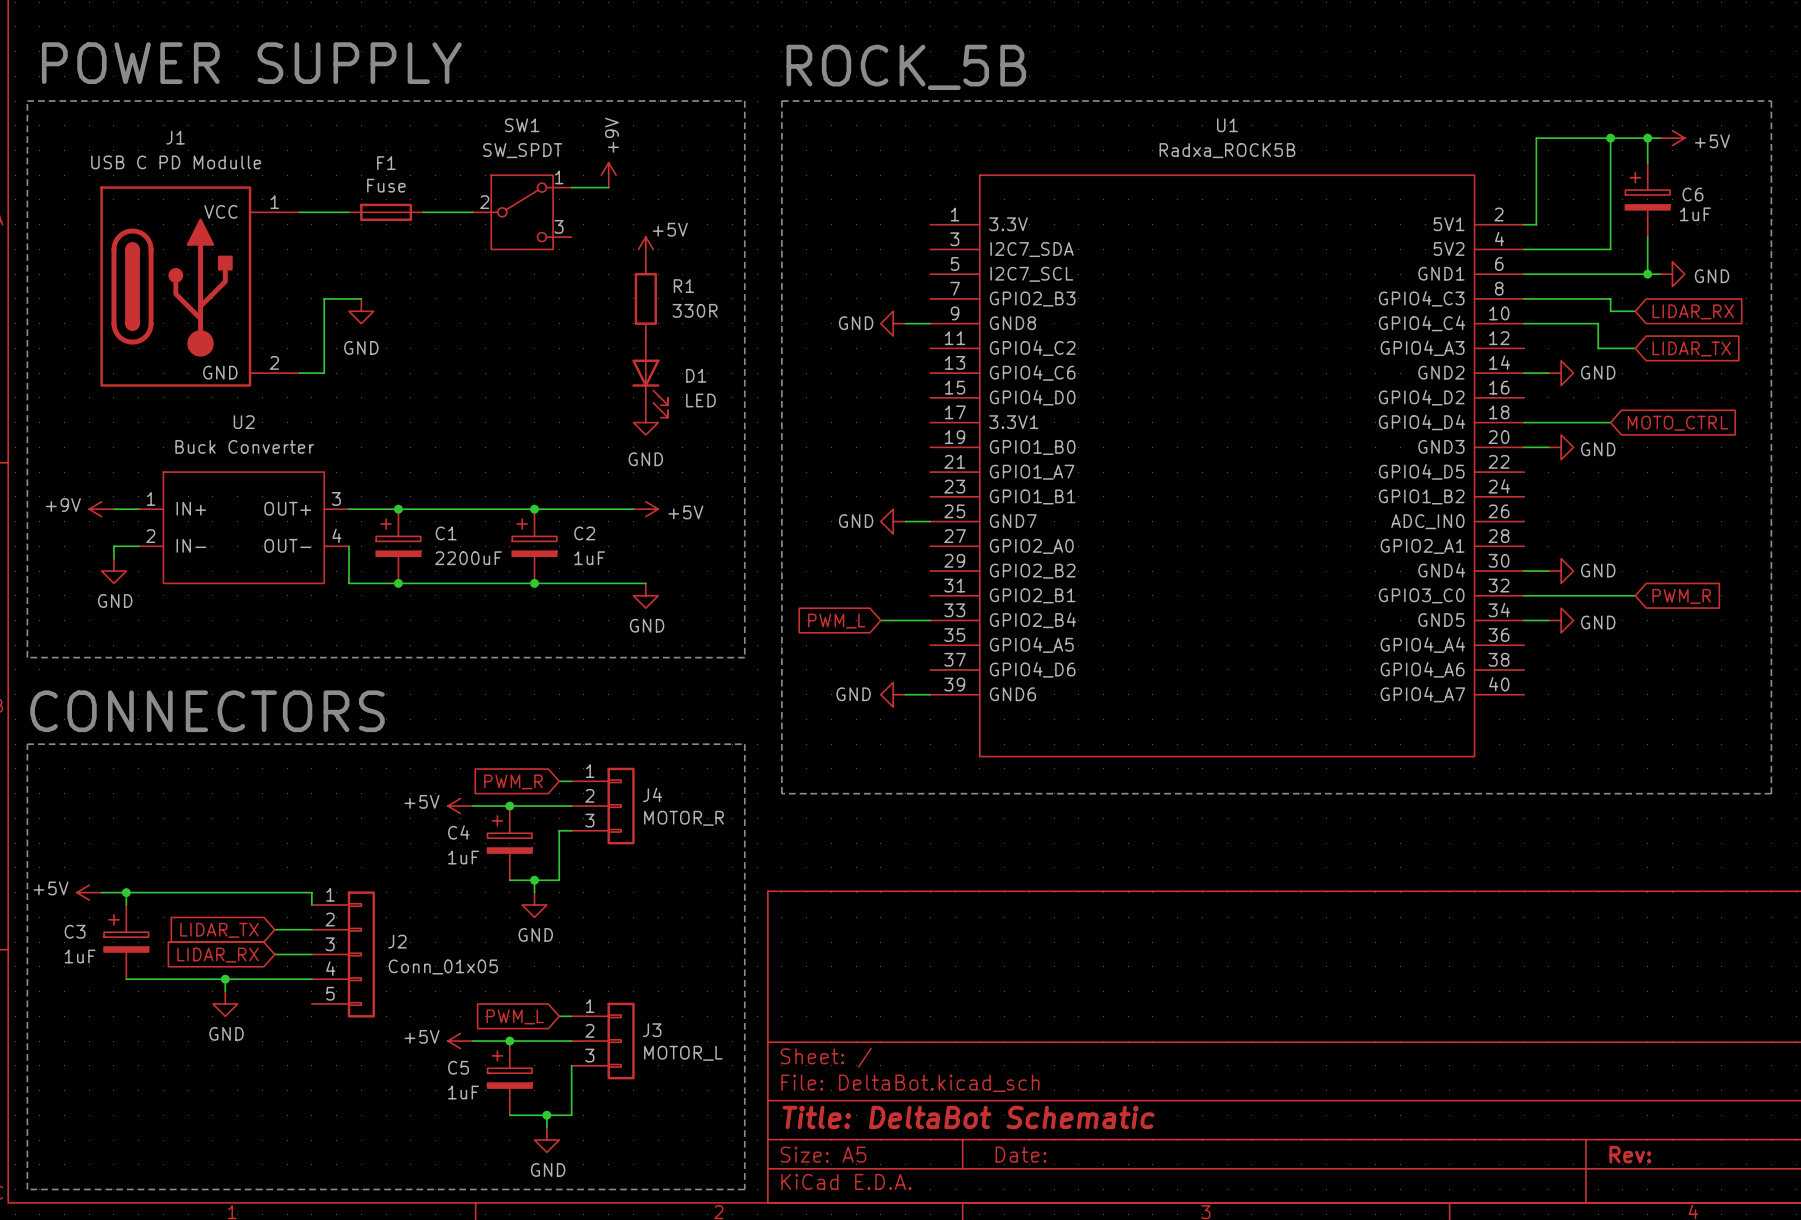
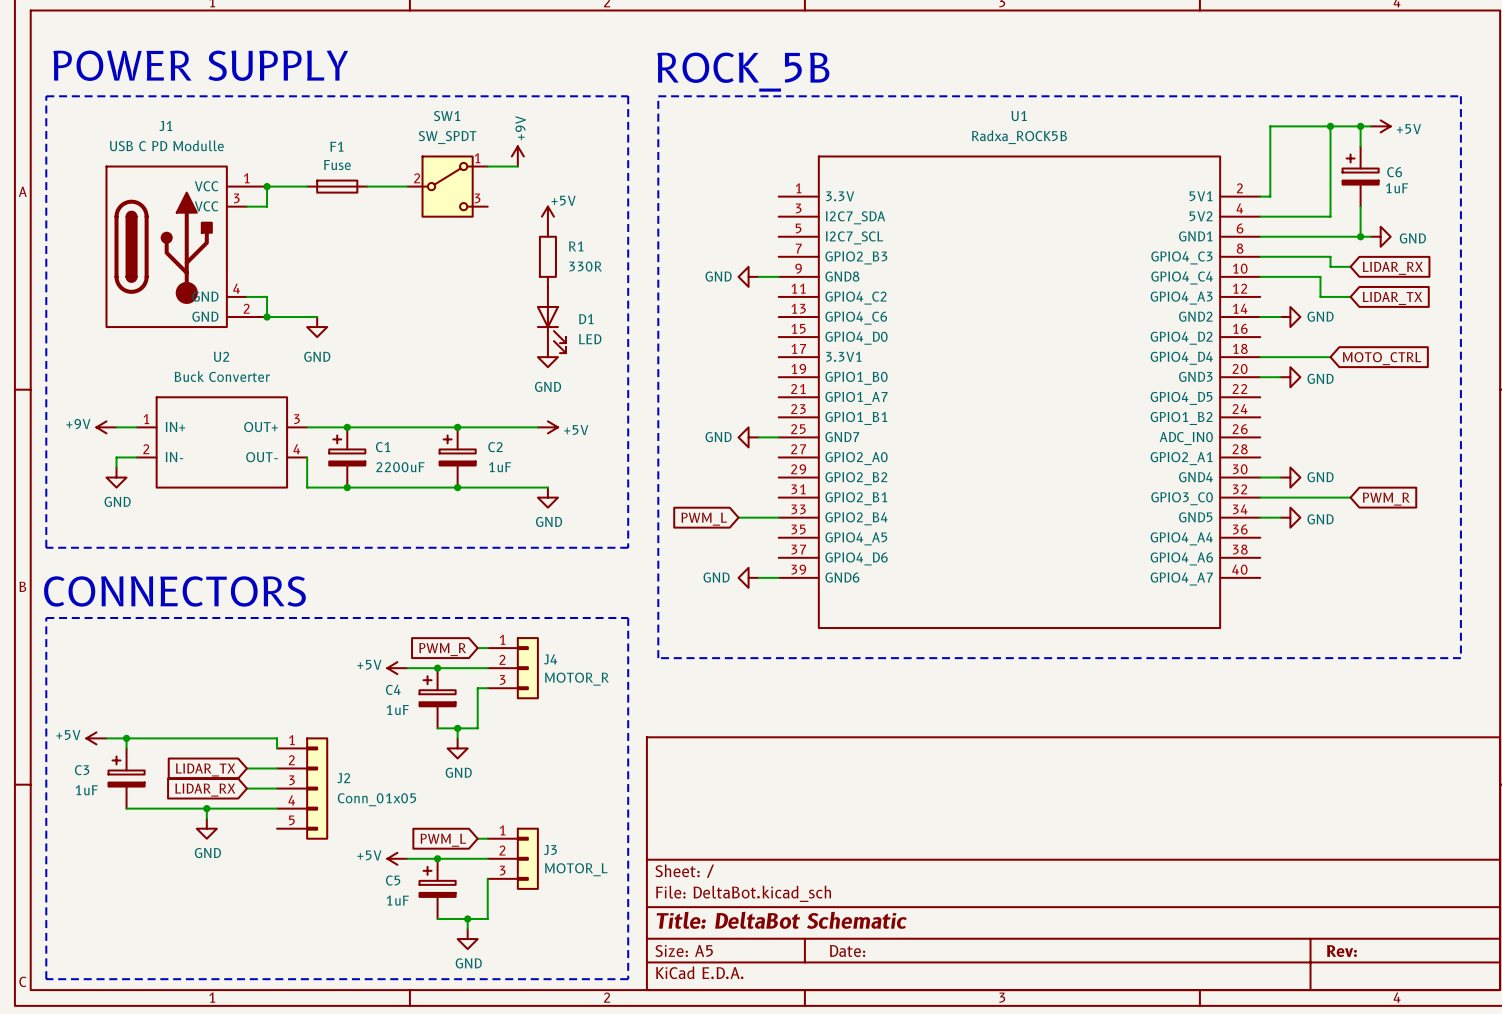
J1 symbol: [100, 186, 300, 387] -> [105, 165, 268, 329]
wire: none -> (267, 186) (267, 206) (246, 206)
junction: none -> (267, 186)
wire: (361, 298) (324, 298) (324, 373) -> (317, 317) (287, 317)
power symbol position: GND (361, 311) -> GND (317, 327)
wire: none -> (246, 296) (267, 296) (267, 317)
junction: none -> (267, 317)

